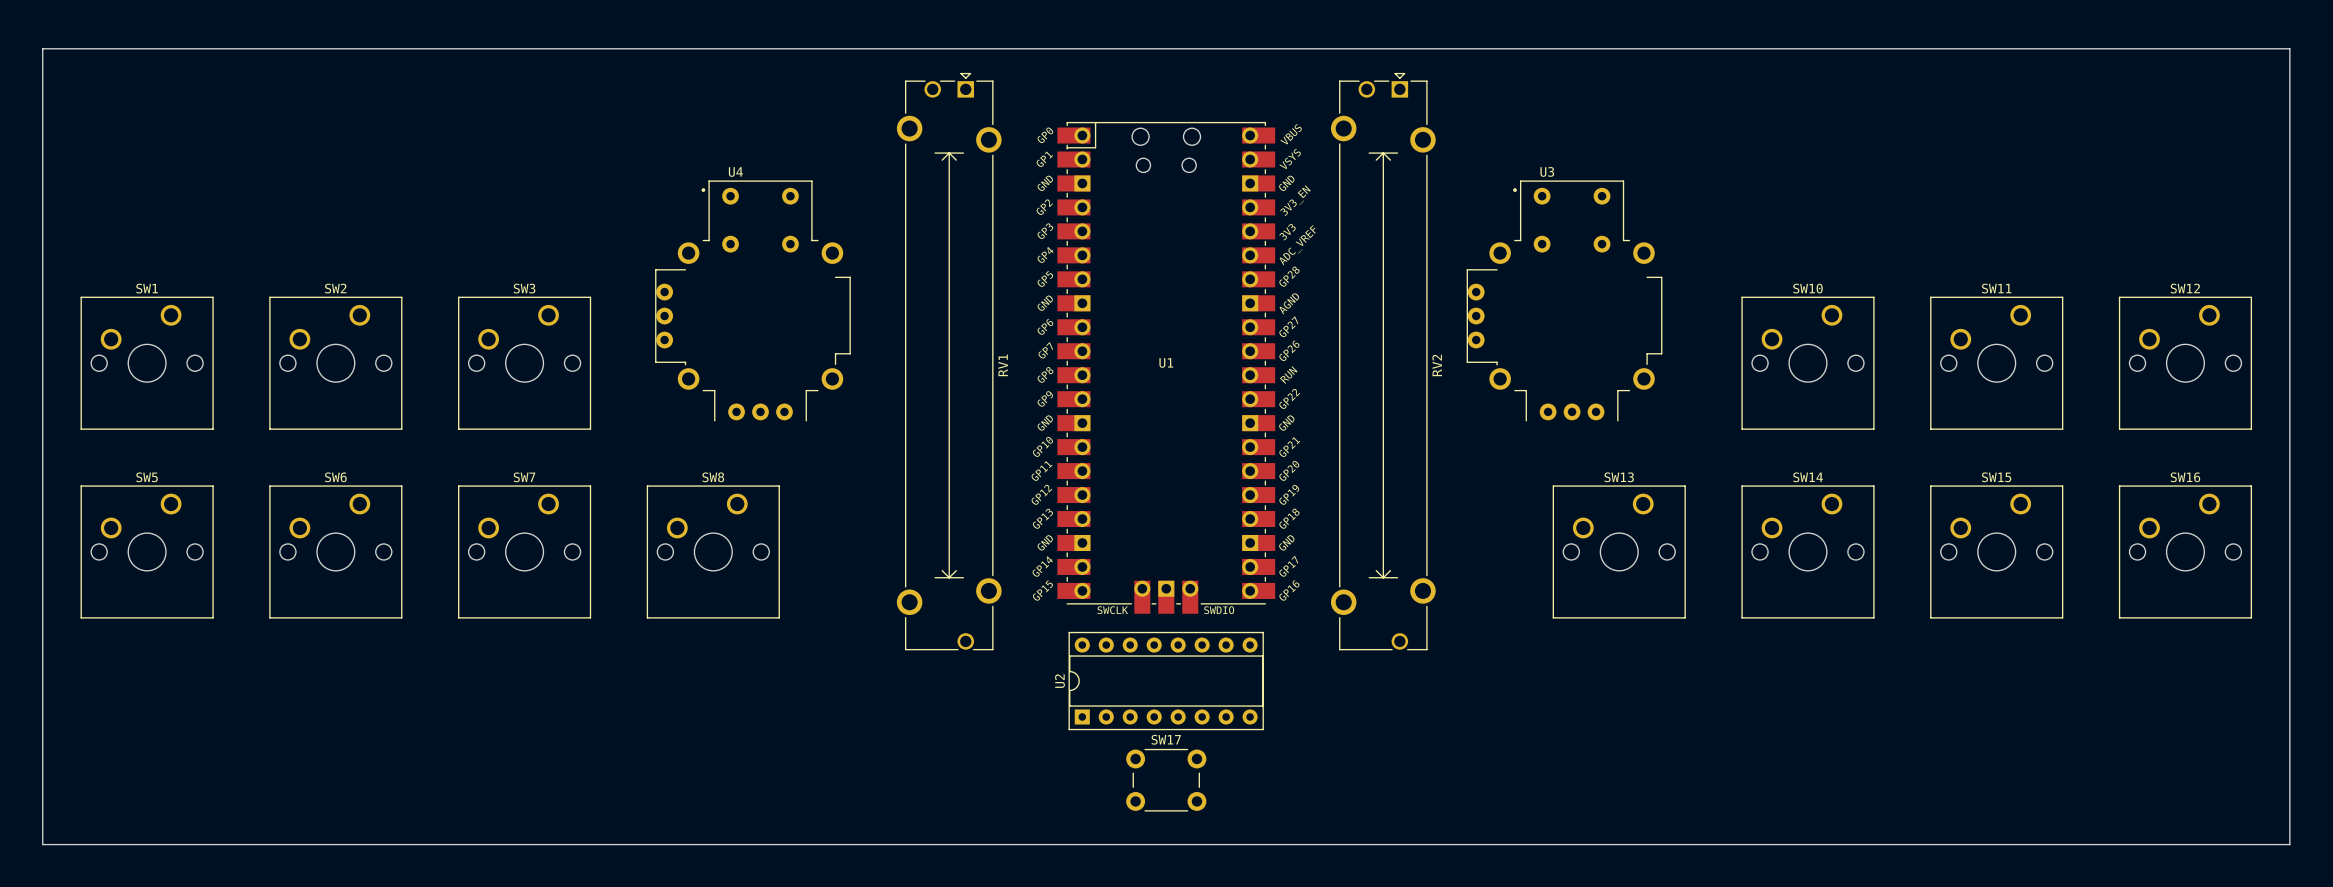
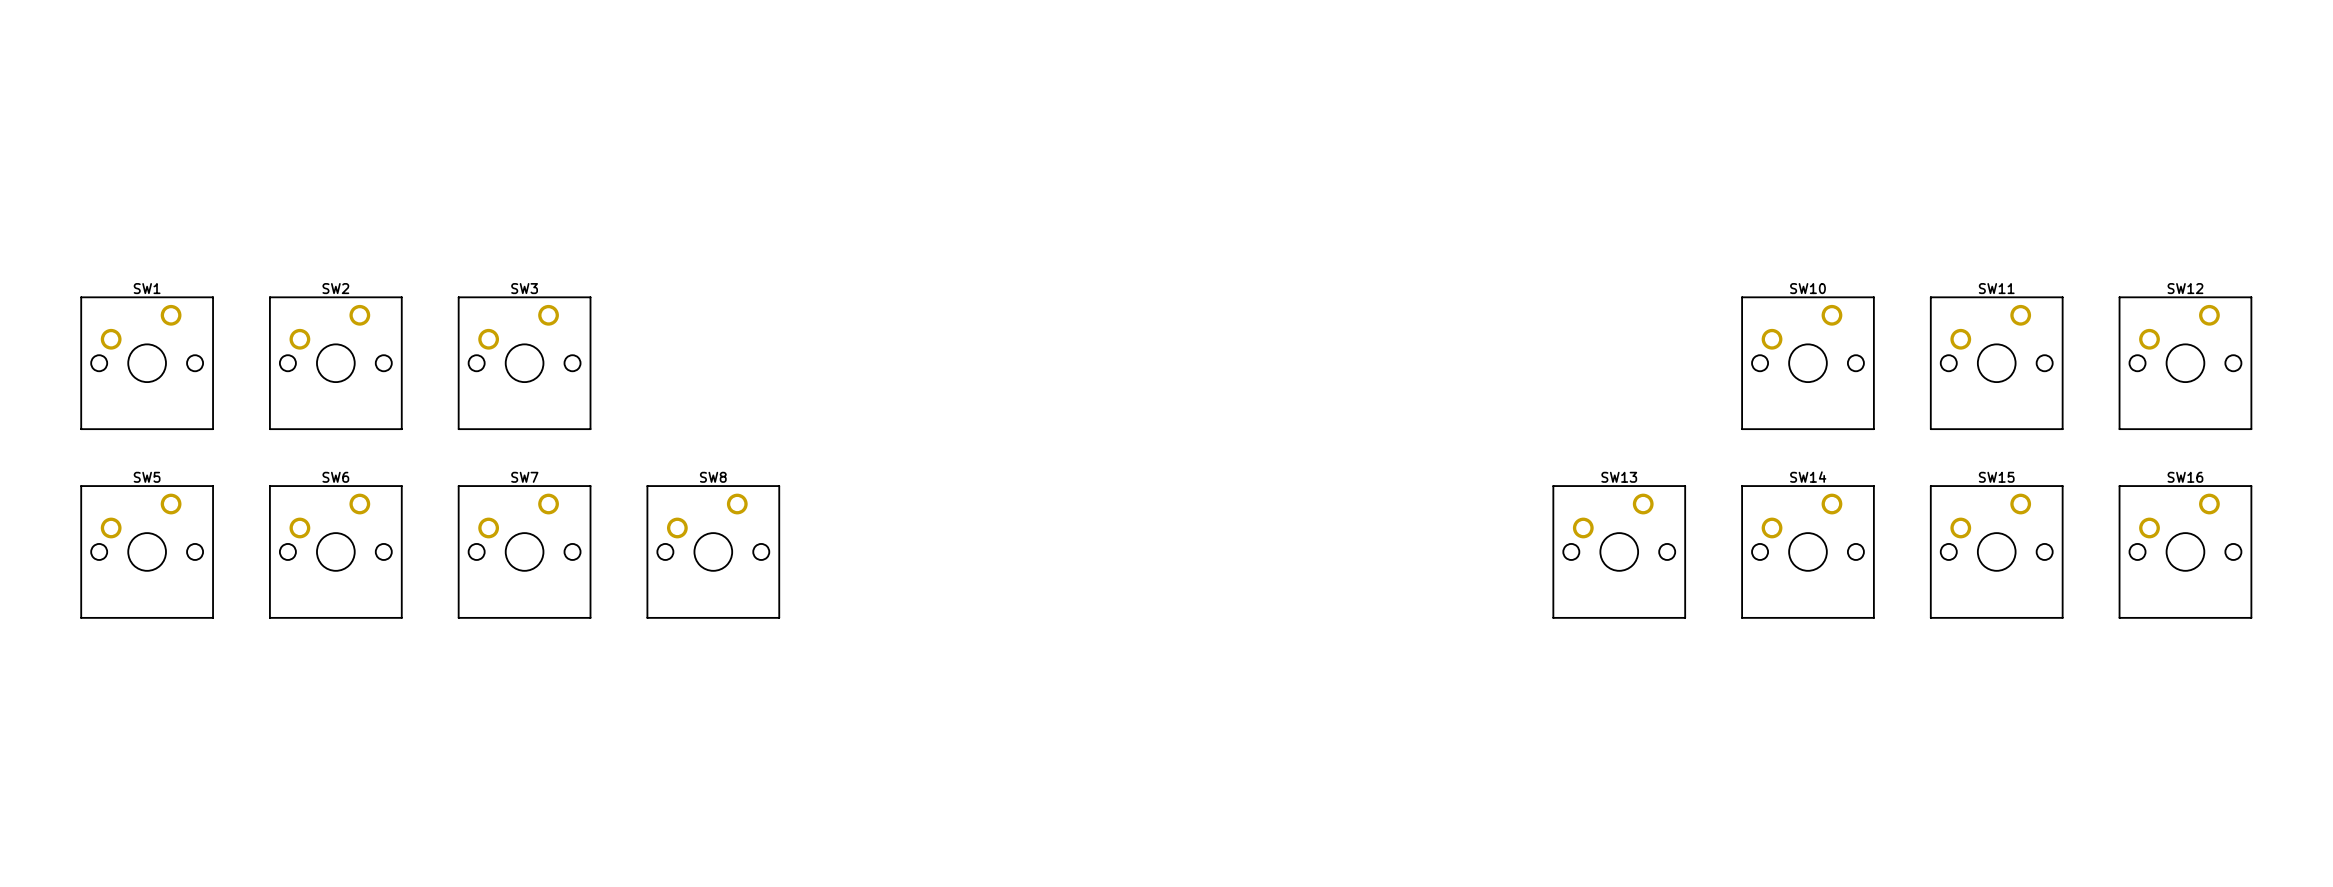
board edge: (42, 48) (2289, 48) (2289, 844) (42, 844) (42, 48) -> none
U4: (752, 300) -> none
U3: (1564, 300) -> none
RV1: (949, 361) -> none
RV2: (1383, 361) -> none
U1: (1166, 367) -> none
U2: (1166, 681) -> none
SW17: (1166, 780) -> none

